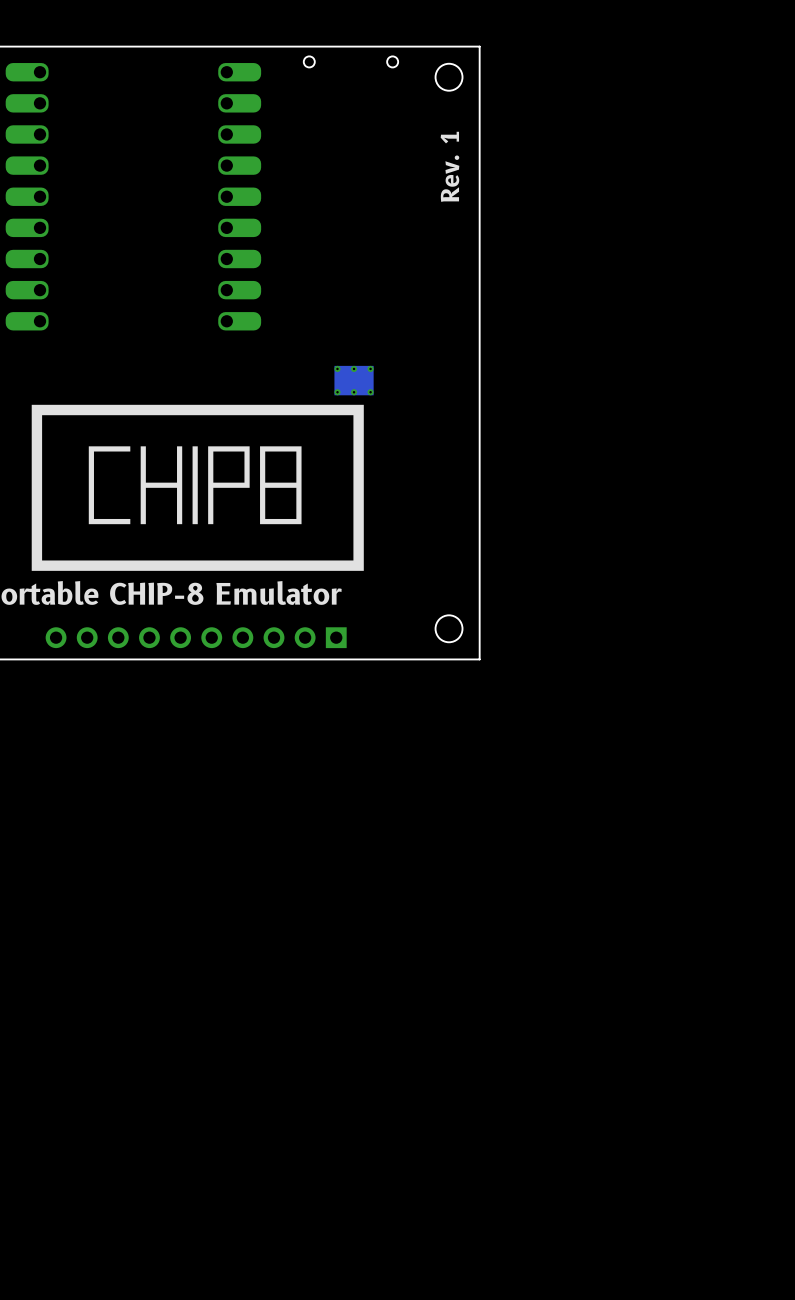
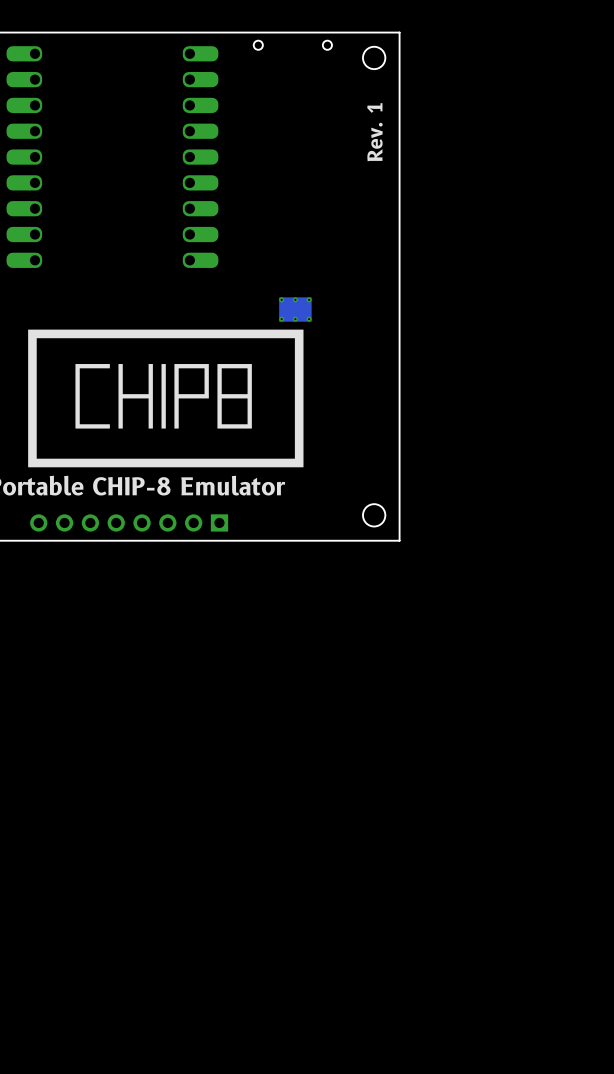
part: none -> (129, 522)
part: (196, 637) -> none

